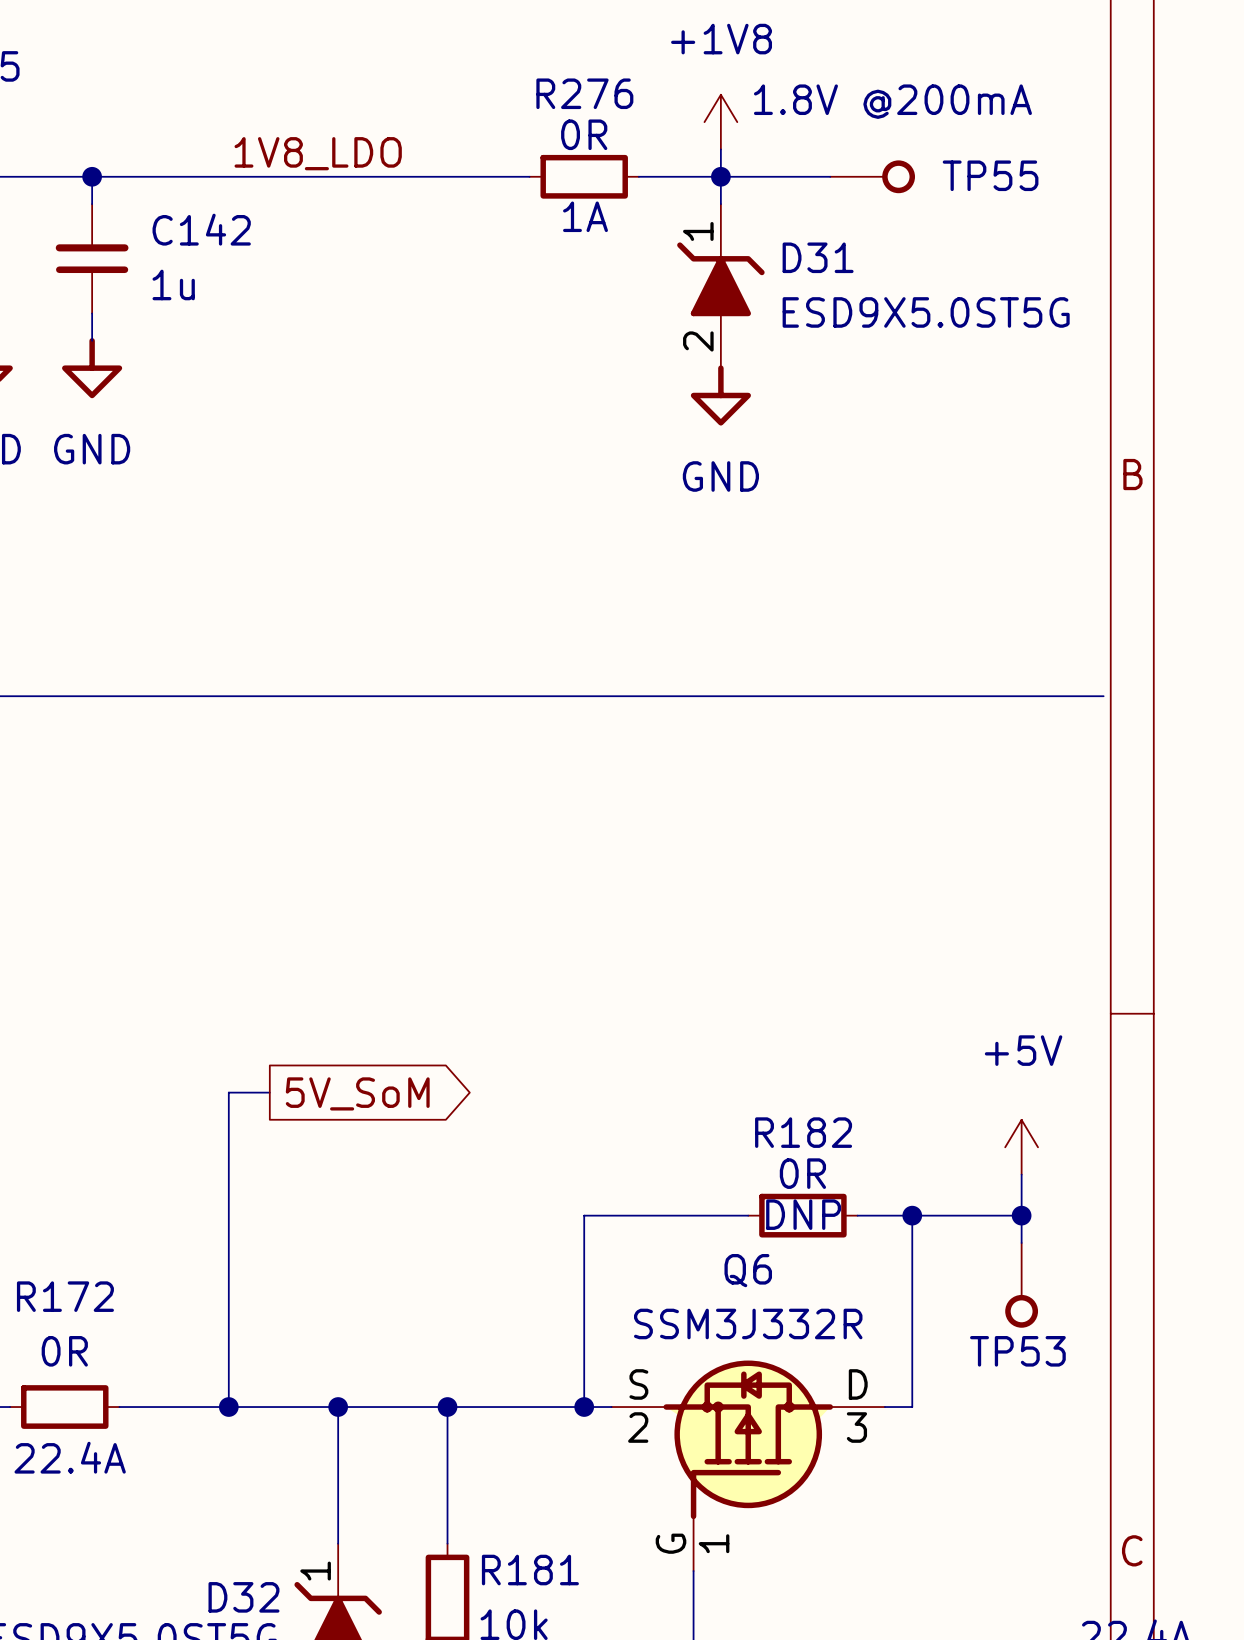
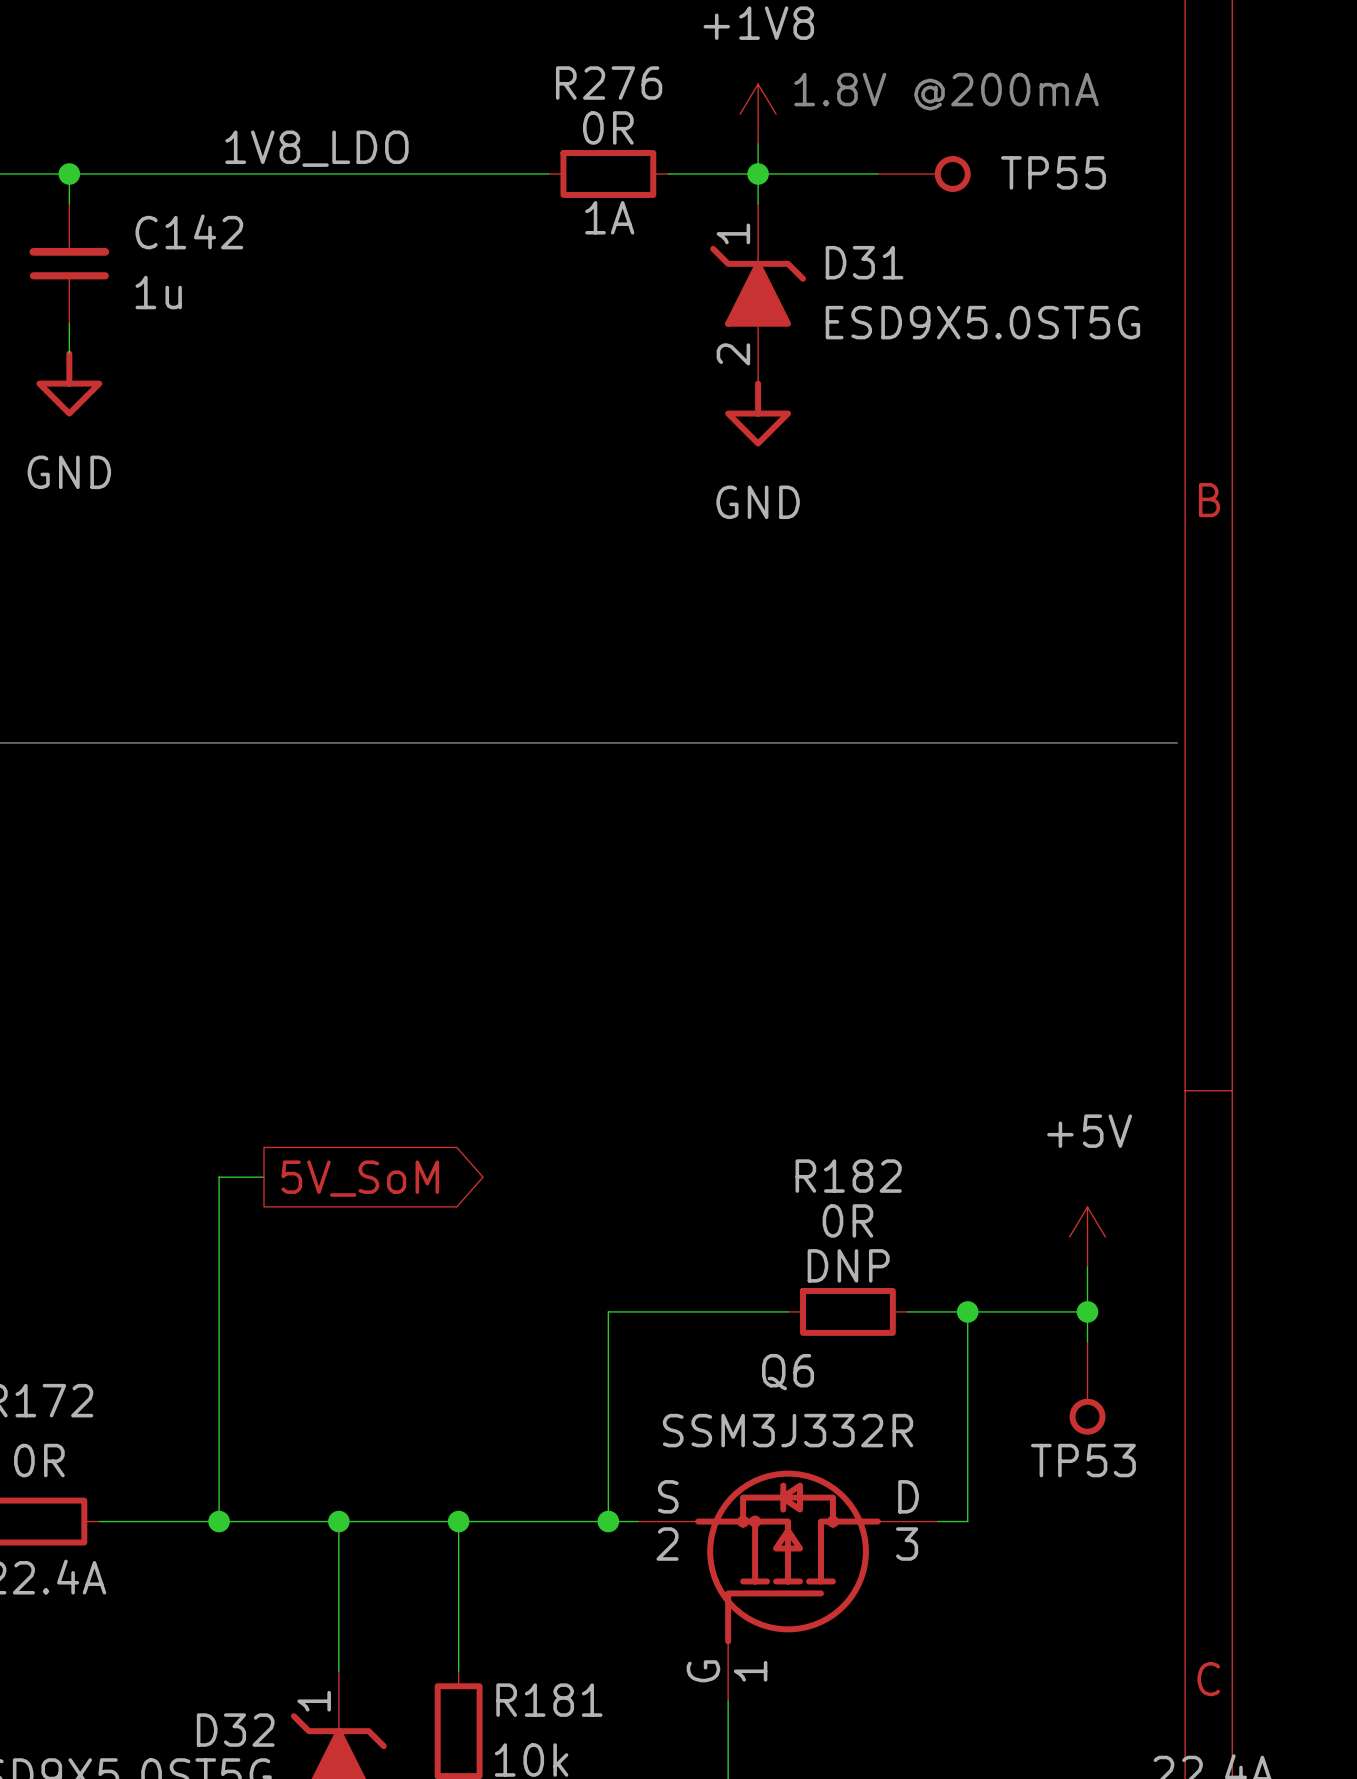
R182 name position: R182 (803, 1132) -> R182 (848, 1176)
R182 text position: 0R (802, 1173) -> 0R (847, 1220)
R182 text position: DNP (803, 1214) -> DNP (848, 1265)

